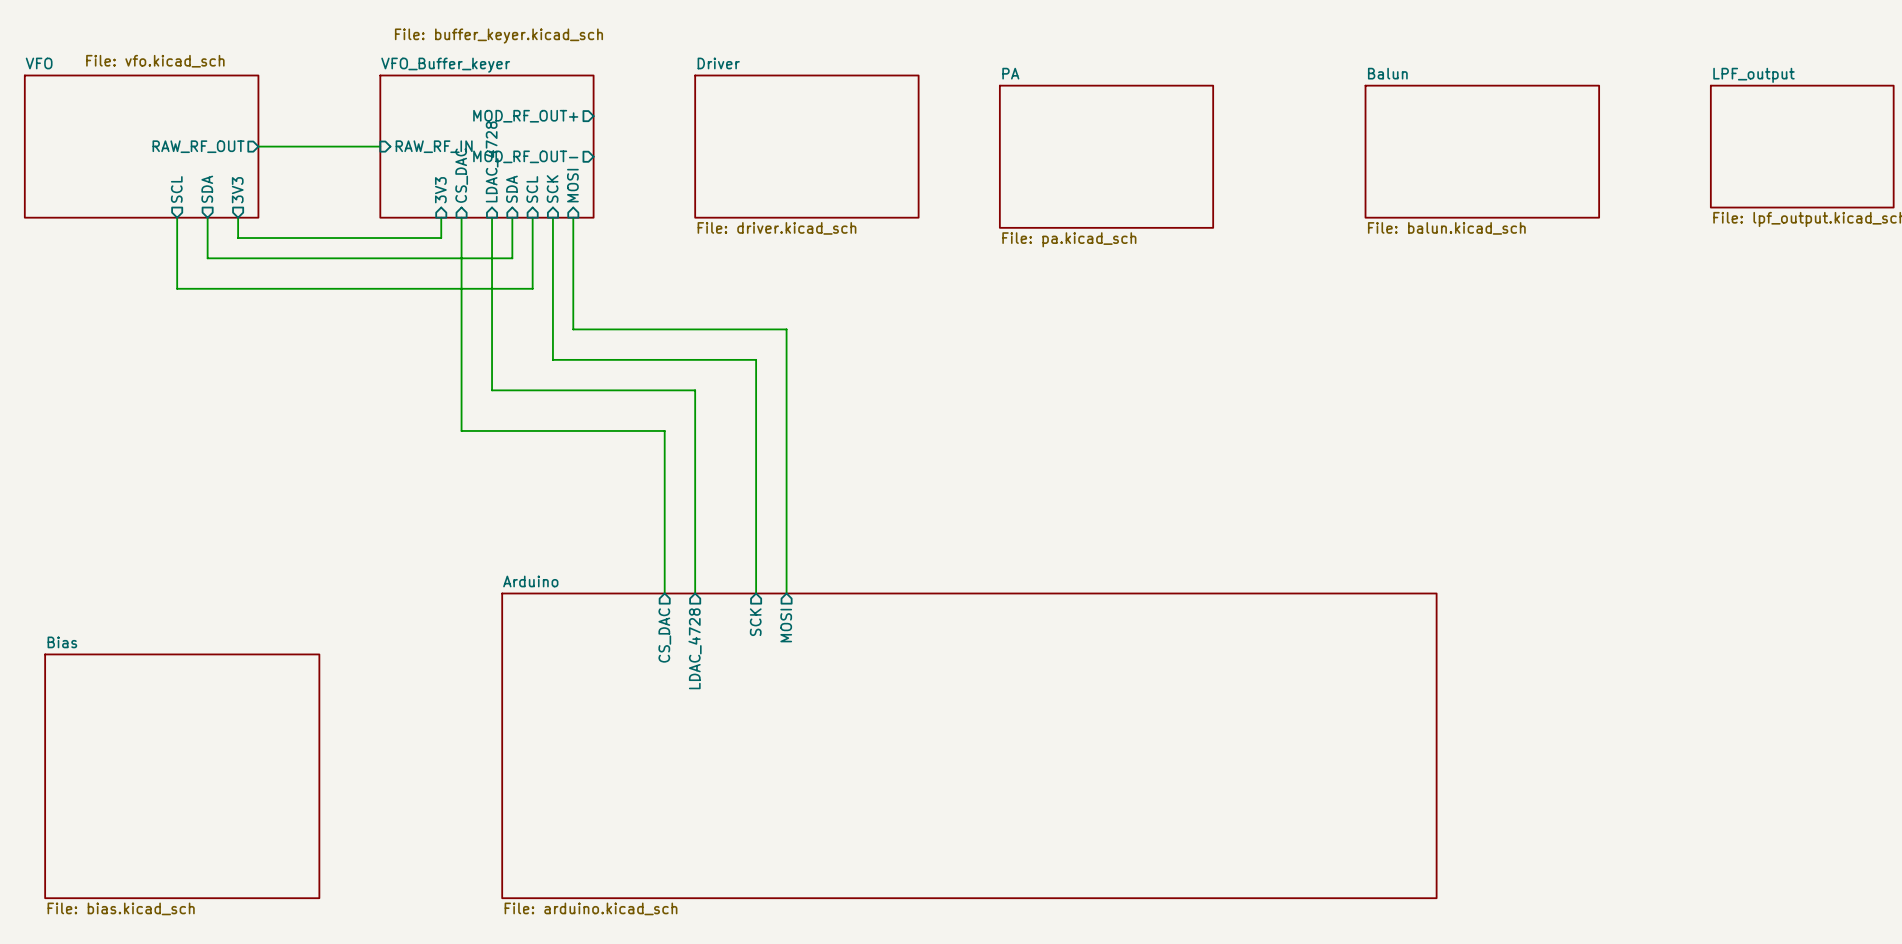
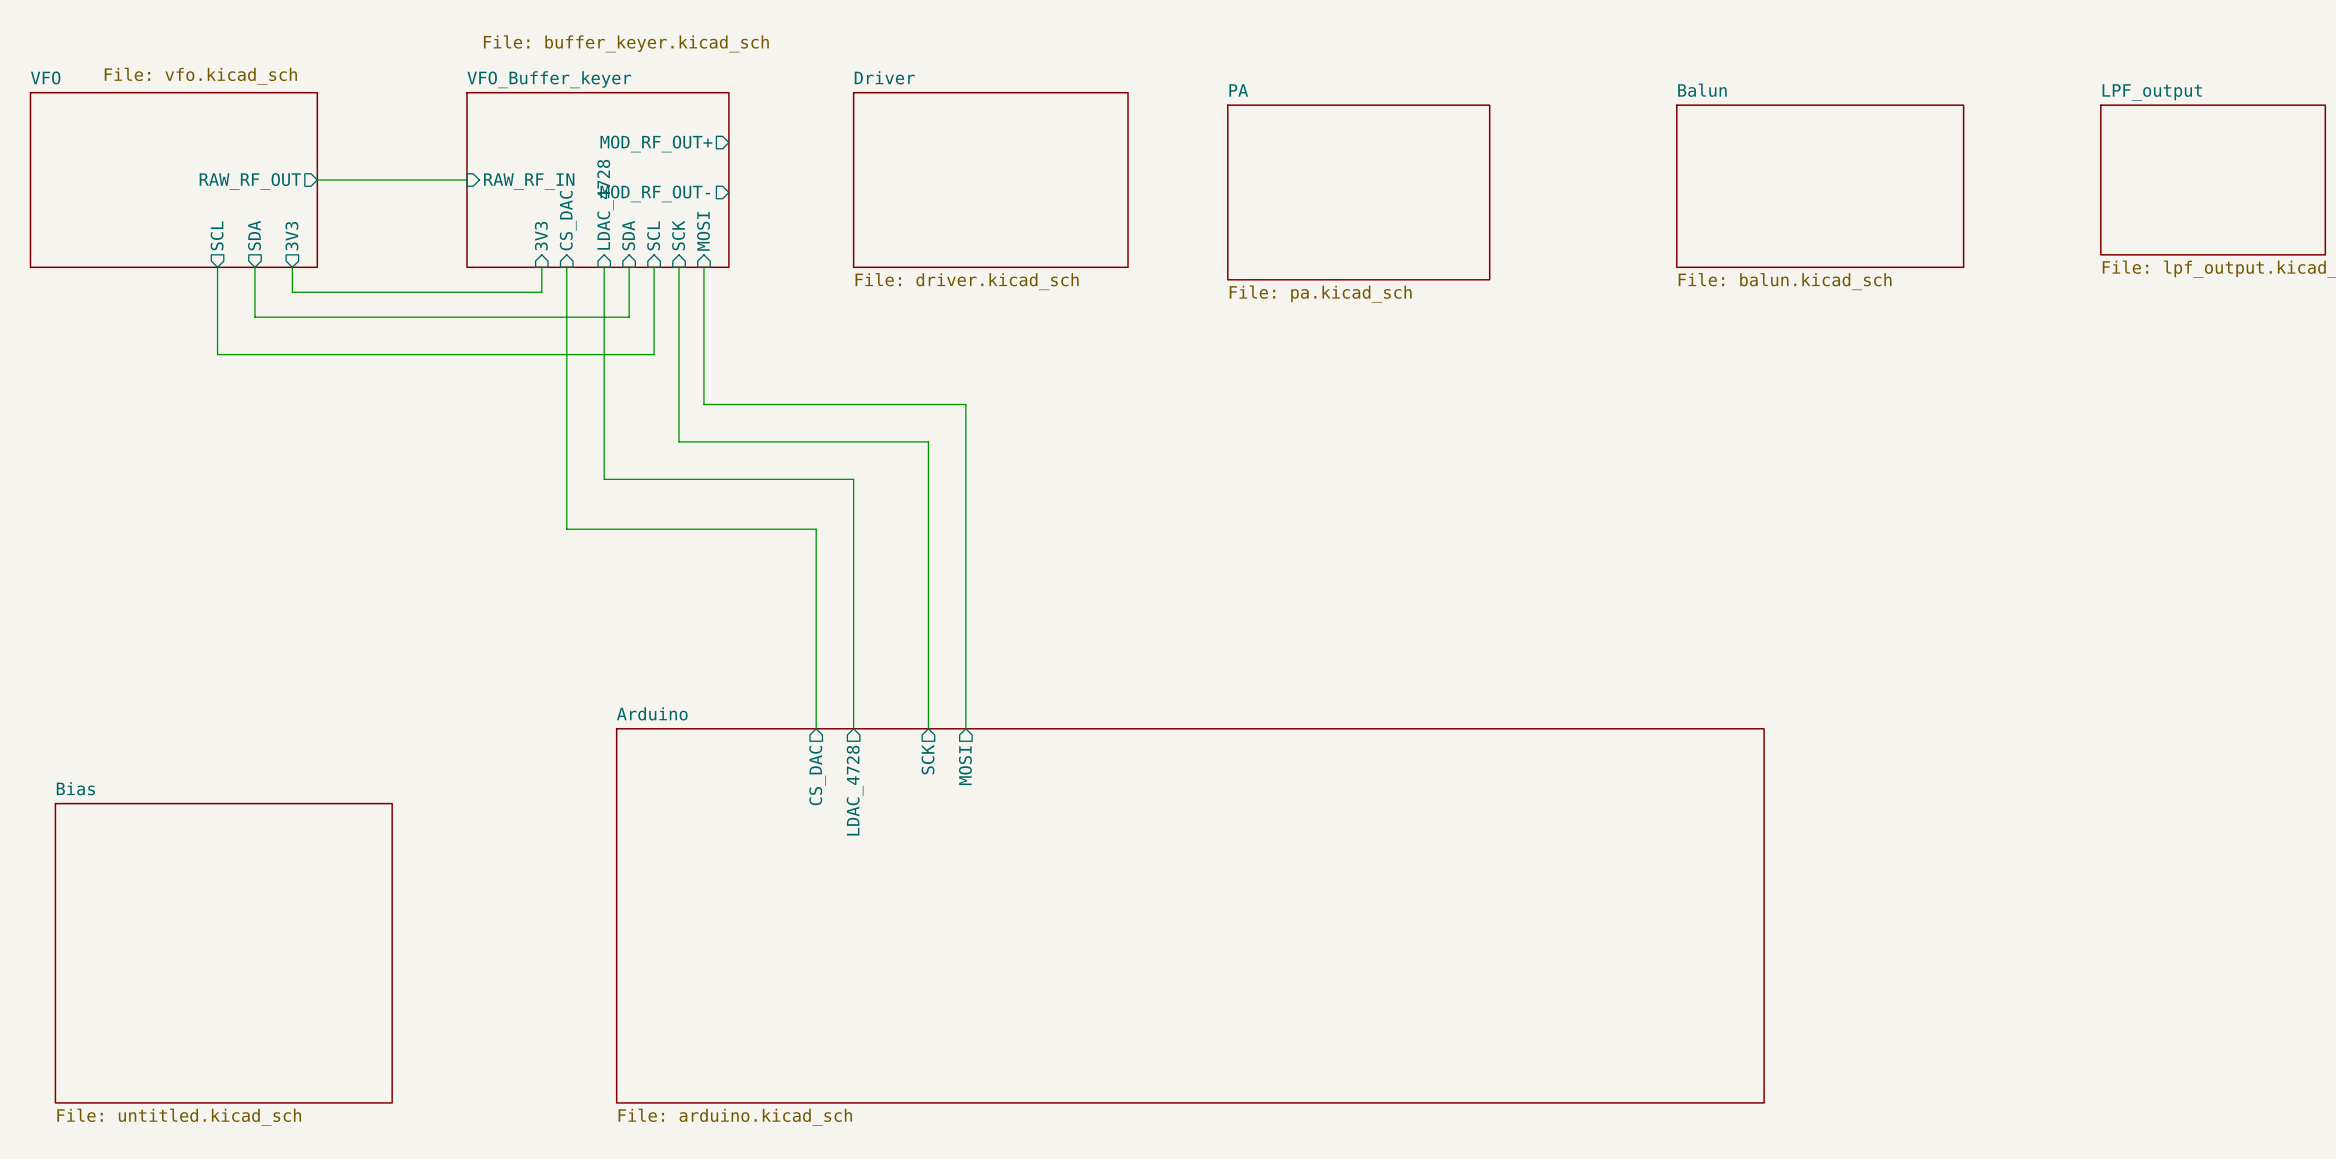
sheet Bias value: File: bias.kicad_sch (121, 908) -> File: untitled.kicad_sch (179, 1117)

